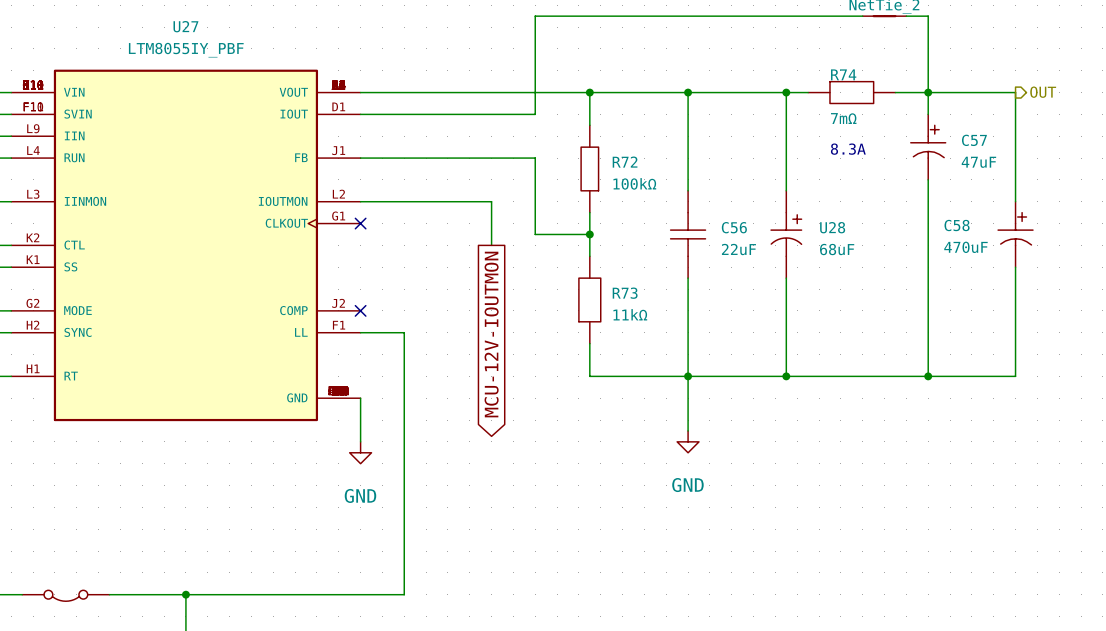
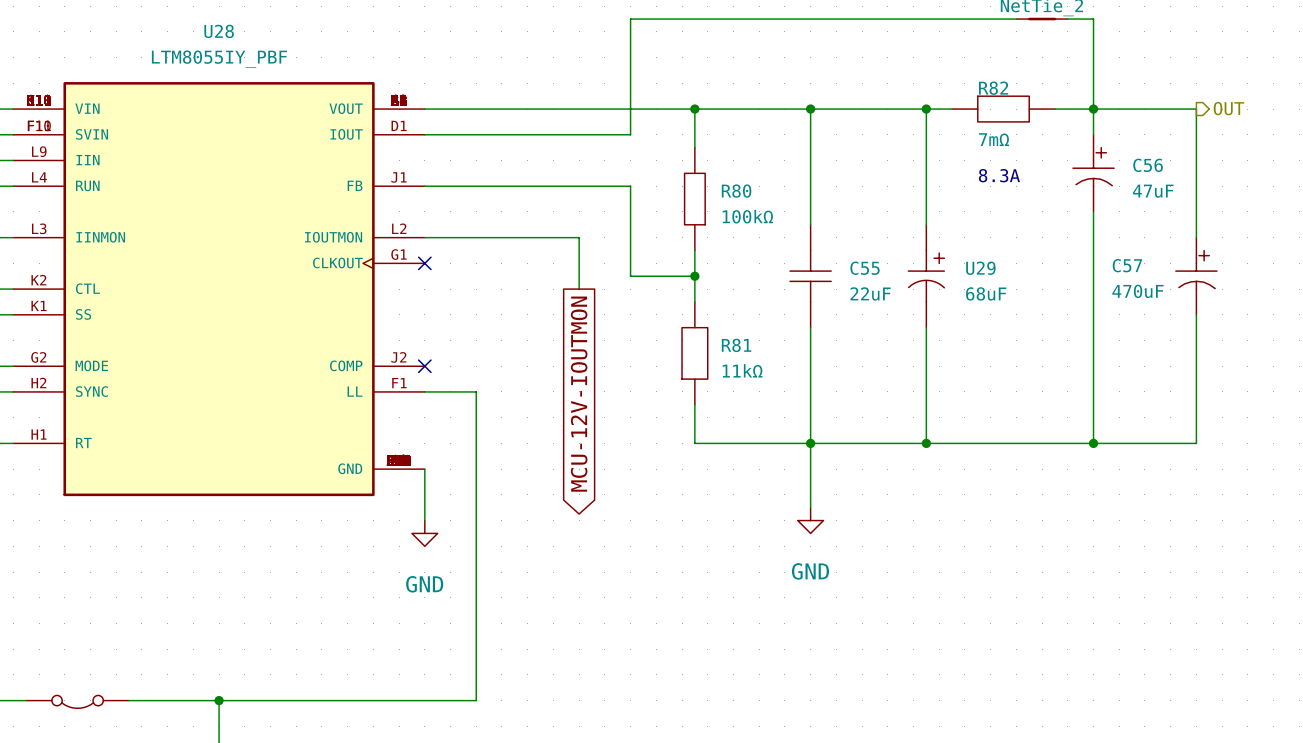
U27 name: U27 (185, 26) -> U28 (219, 31)
R74 name: R74 (843, 74) -> R82 (993, 88)
C57 name: C57 (974, 140) -> C56 (1148, 165)
R72 name: R72 (625, 162) -> R80 (736, 191)
C58 name: C58 (957, 225) -> C57 (1127, 265)
C56 name: C56 (734, 227) -> C55 (865, 268)
U28 name: U28 (832, 227) -> U29 (980, 268)
R73 name: R73 (625, 293) -> R81 (736, 345)

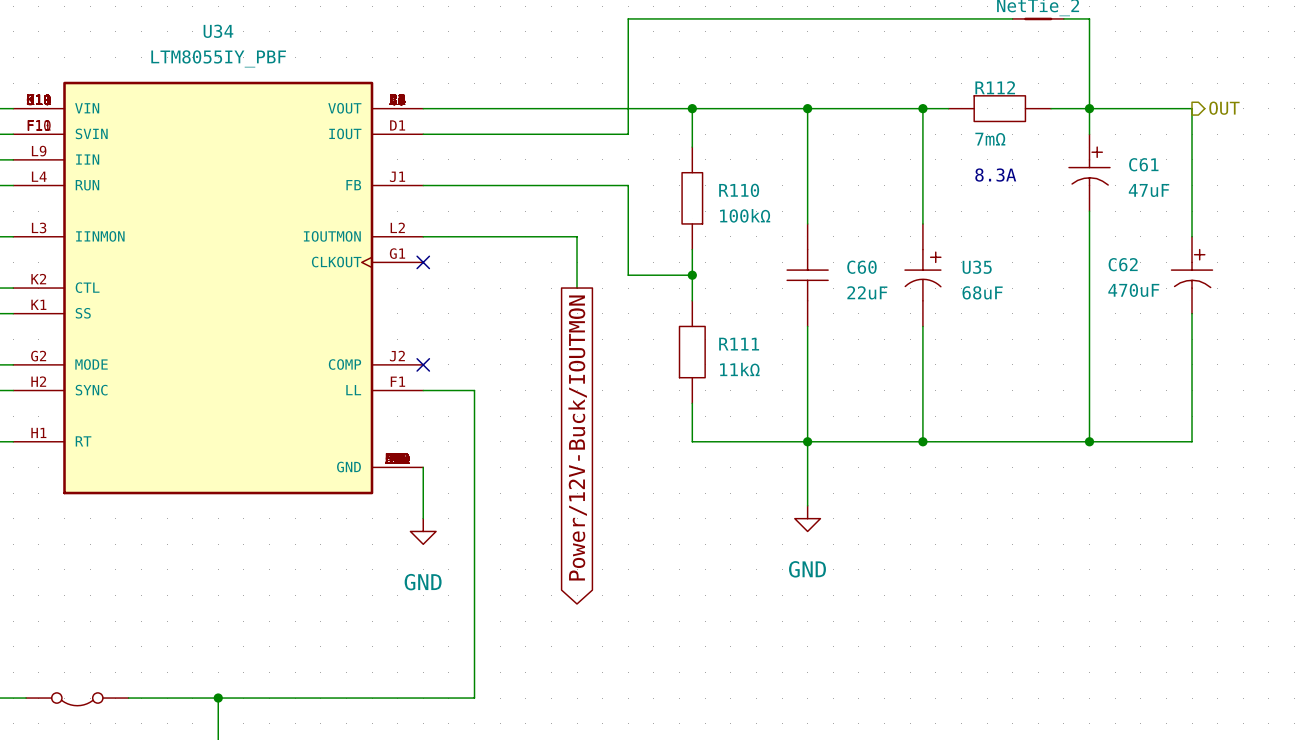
U28 name: U28 (219, 31) -> U34 (218, 31)
R82 name: R82 (993, 88) -> R112 (995, 87)
C56 name: C56 (1148, 165) -> C61 (1143, 164)
R80 name: R80 (736, 191) -> R110 (739, 190)
C57 name: C57 (1127, 265) -> C62 (1123, 264)
C55 name: C55 (865, 268) -> C60 (861, 267)
U29 name: U29 (980, 268) -> U35 (977, 267)
R81 name: R81 (736, 345) -> R111 (739, 344)
global label: MCU-12V-IOUTMON (579, 394) -> Power/12V-Buck/IOUTMON (577, 437)

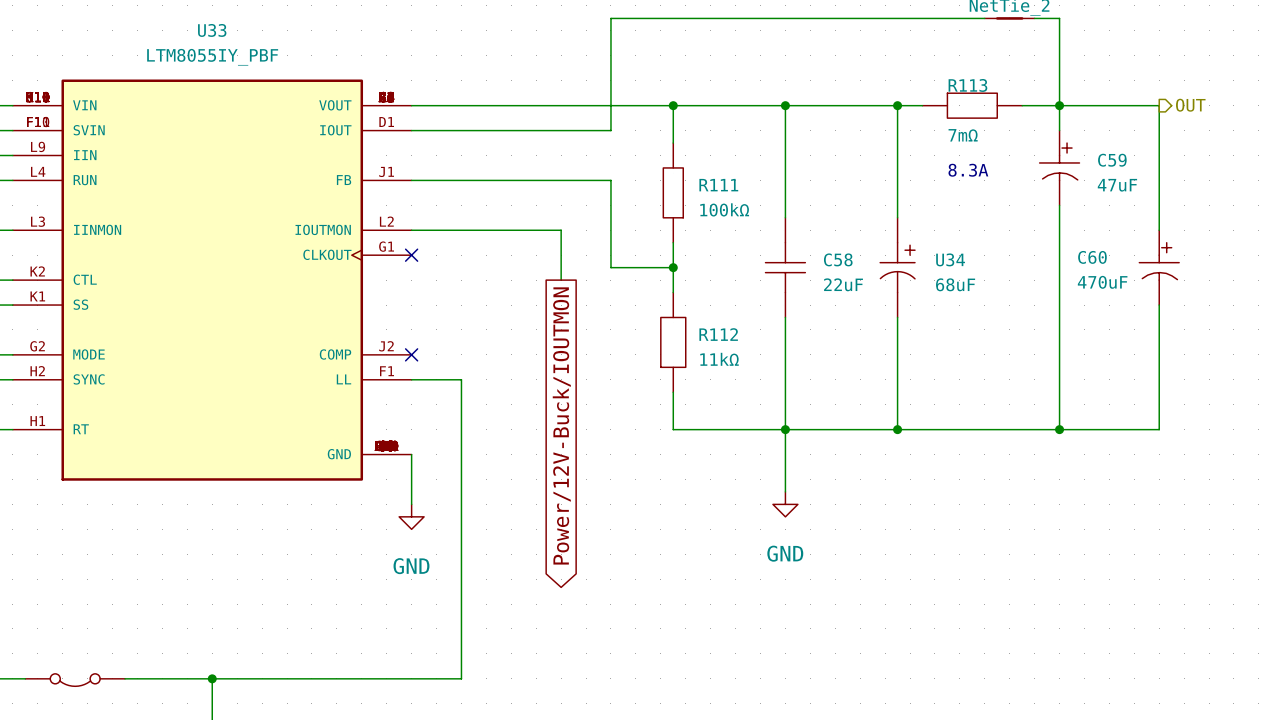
U34 name: U34 (218, 31) -> U33 (212, 30)
R112 name: R112 (995, 87) -> R113 (967, 85)
C61 name: C61 (1143, 164) -> C59 (1112, 160)
R110 name: R110 (739, 190) -> R111 (718, 185)
C62 name: C62 (1123, 264) -> C60 (1092, 257)
C60 name: C60 (861, 267) -> C58 (838, 259)
U35 name: U35 (977, 267) -> U34 (950, 259)
R111 name: R111 (739, 344) -> R112 (718, 334)

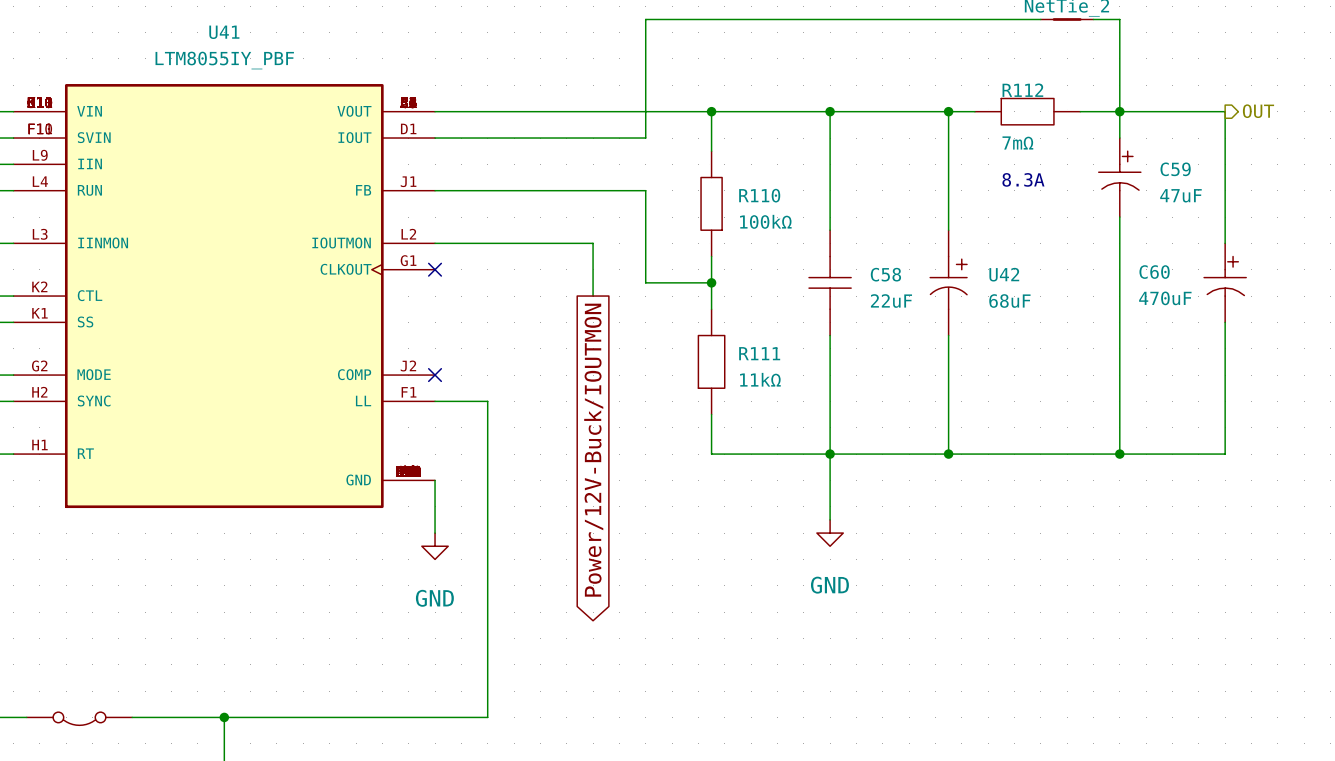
U33 name: U33 (212, 30) -> U41 (224, 32)
R113 name: R113 (967, 85) -> R112 (1022, 90)
R111 name: R111 (718, 185) -> R110 (759, 195)
U34 name: U34 (950, 259) -> U42 (1004, 274)
R112 name: R112 (718, 334) -> R111 (759, 353)

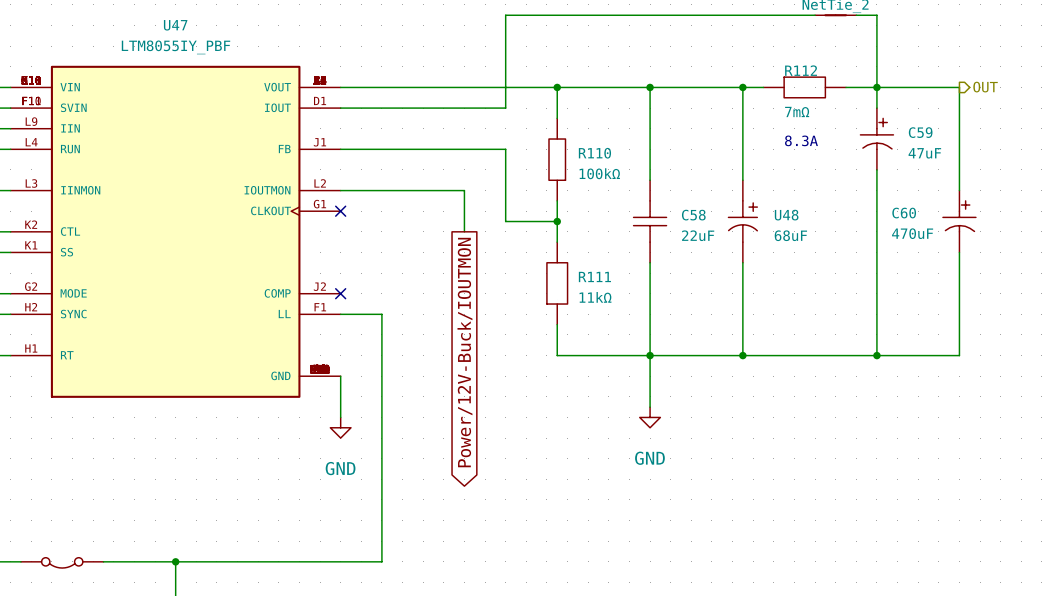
U41 name: U41 (224, 32) -> U47 (175, 25)
U42 name: U42 (1004, 274) -> U48 (786, 215)

